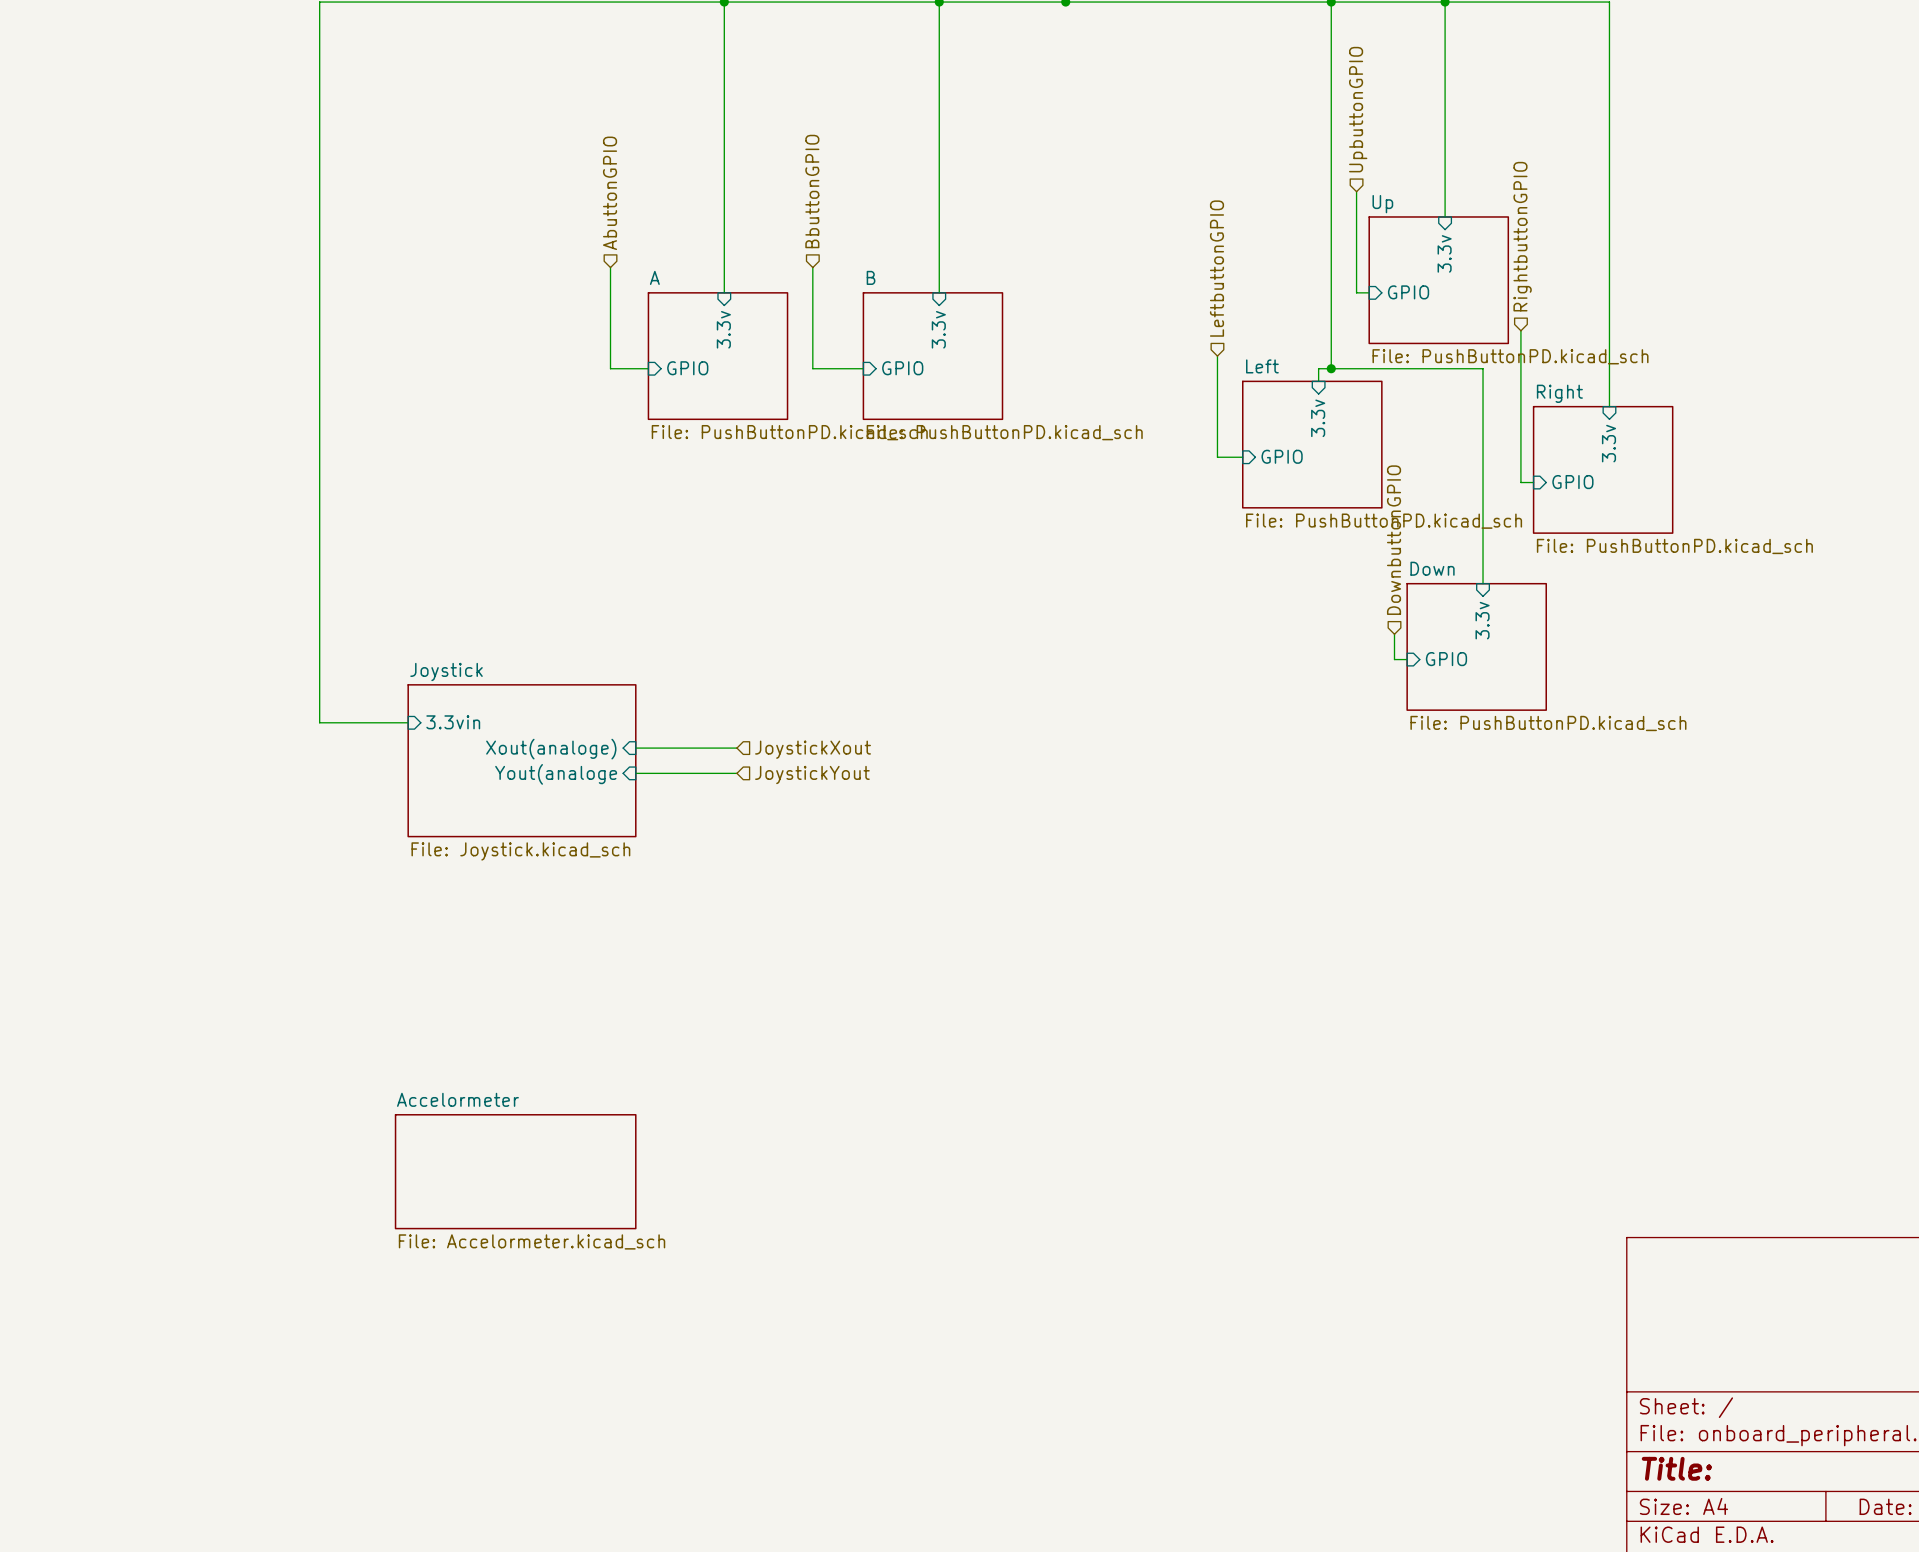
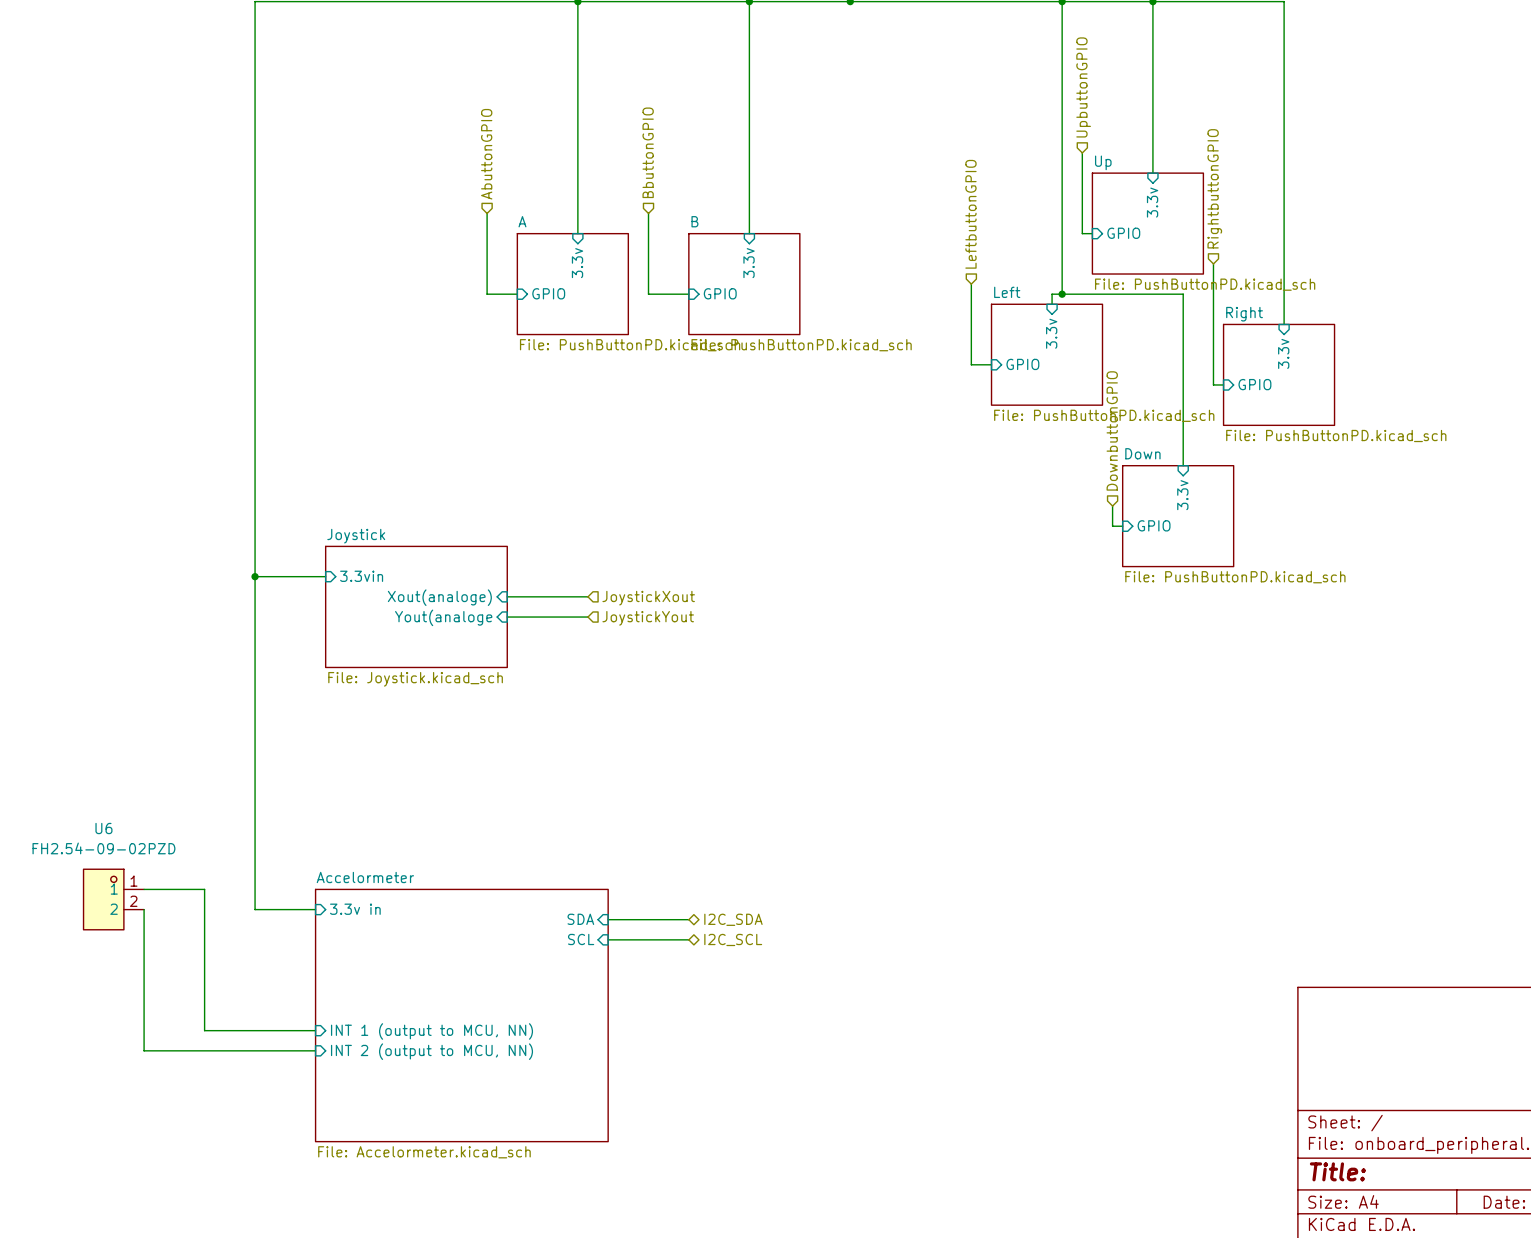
wire: none -> (255, 576) (255, 909) (315, 909)
junction: none -> (255, 576)
wire: none -> (144, 889) (204, 889) (204, 1030) (315, 1030)
U6: none -> FH2.54-09-02PZD (113, 899)
sheet pin: none -> 3.3v in (355, 909)
wire: none -> (144, 909) (144, 1050) (315, 1050)
sheet pin: none -> SDA (580, 919)
wire: none -> (608, 919) (688, 919)
hierarchical label: none -> I2C_SDA (733, 919)
sheet Accelormeter: File: Accelormeter.kicad_sch (515, 1171) -> none
sheet pin: none -> SCL (581, 939)
wire: none -> (608, 939) (688, 939)
hierarchical label: none -> I2C_SCL (733, 939)
sheet Accelormeter: none -> File: Accelormeter.kicad_sch (461, 1015)
sheet pin: none -> INT 1 (output to MCU, NN) (431, 1031)
sheet pin: none -> INT 2 (output to MCU, NN) (431, 1051)

